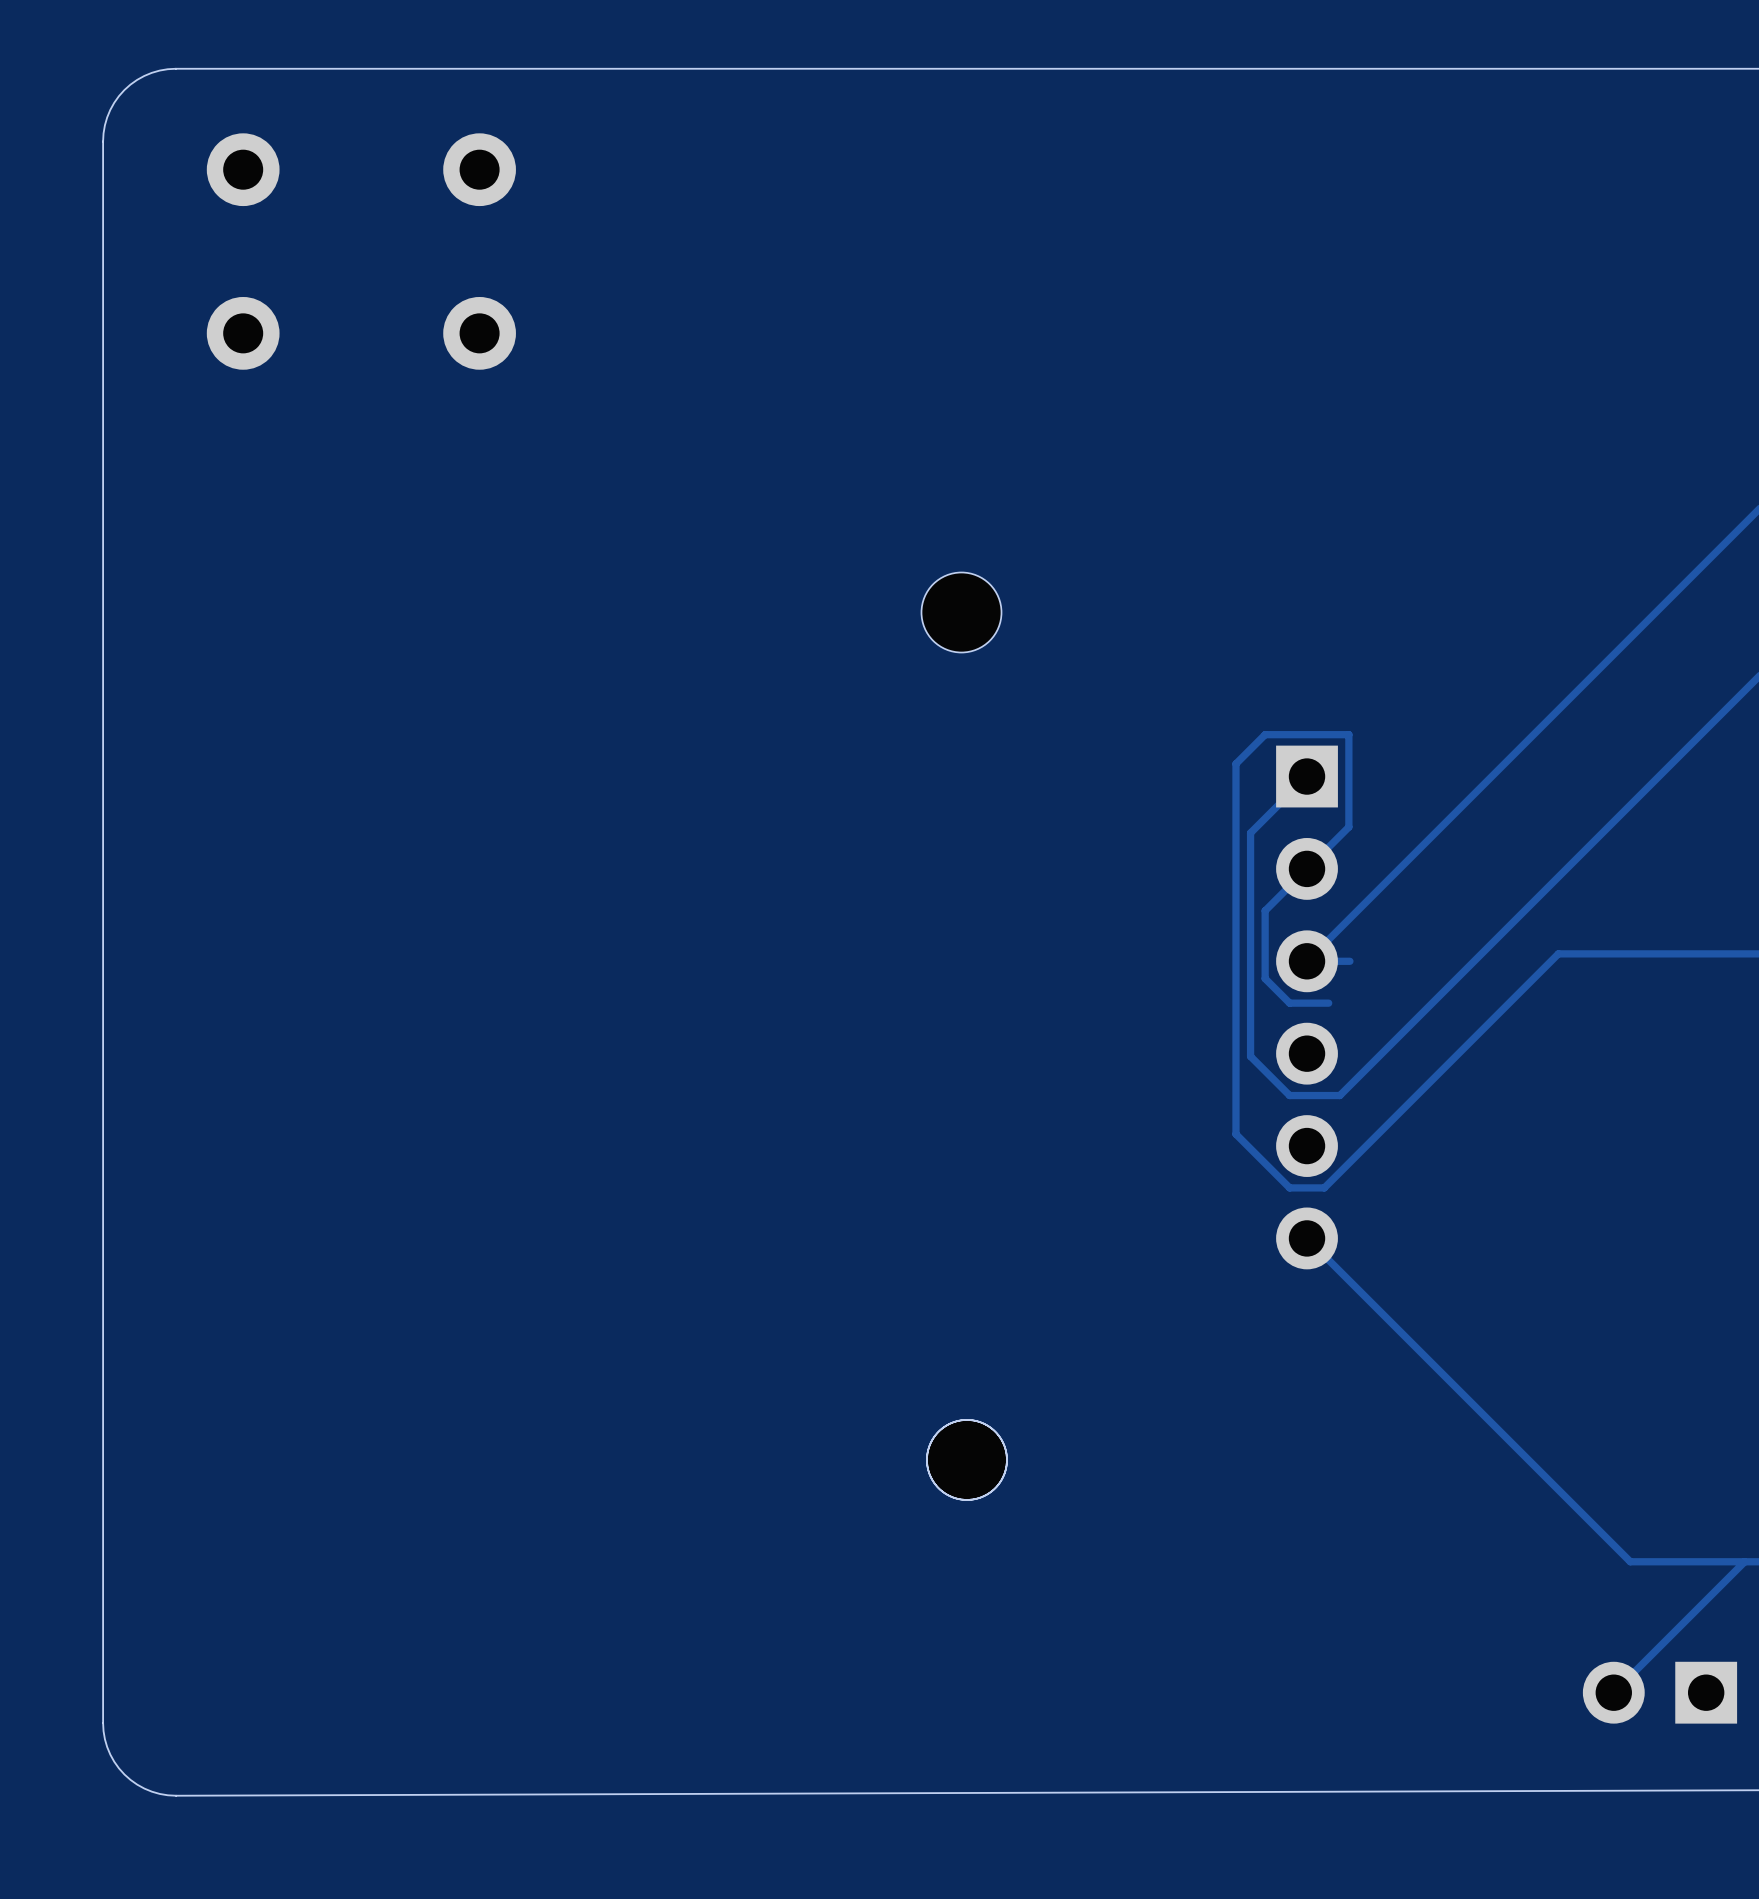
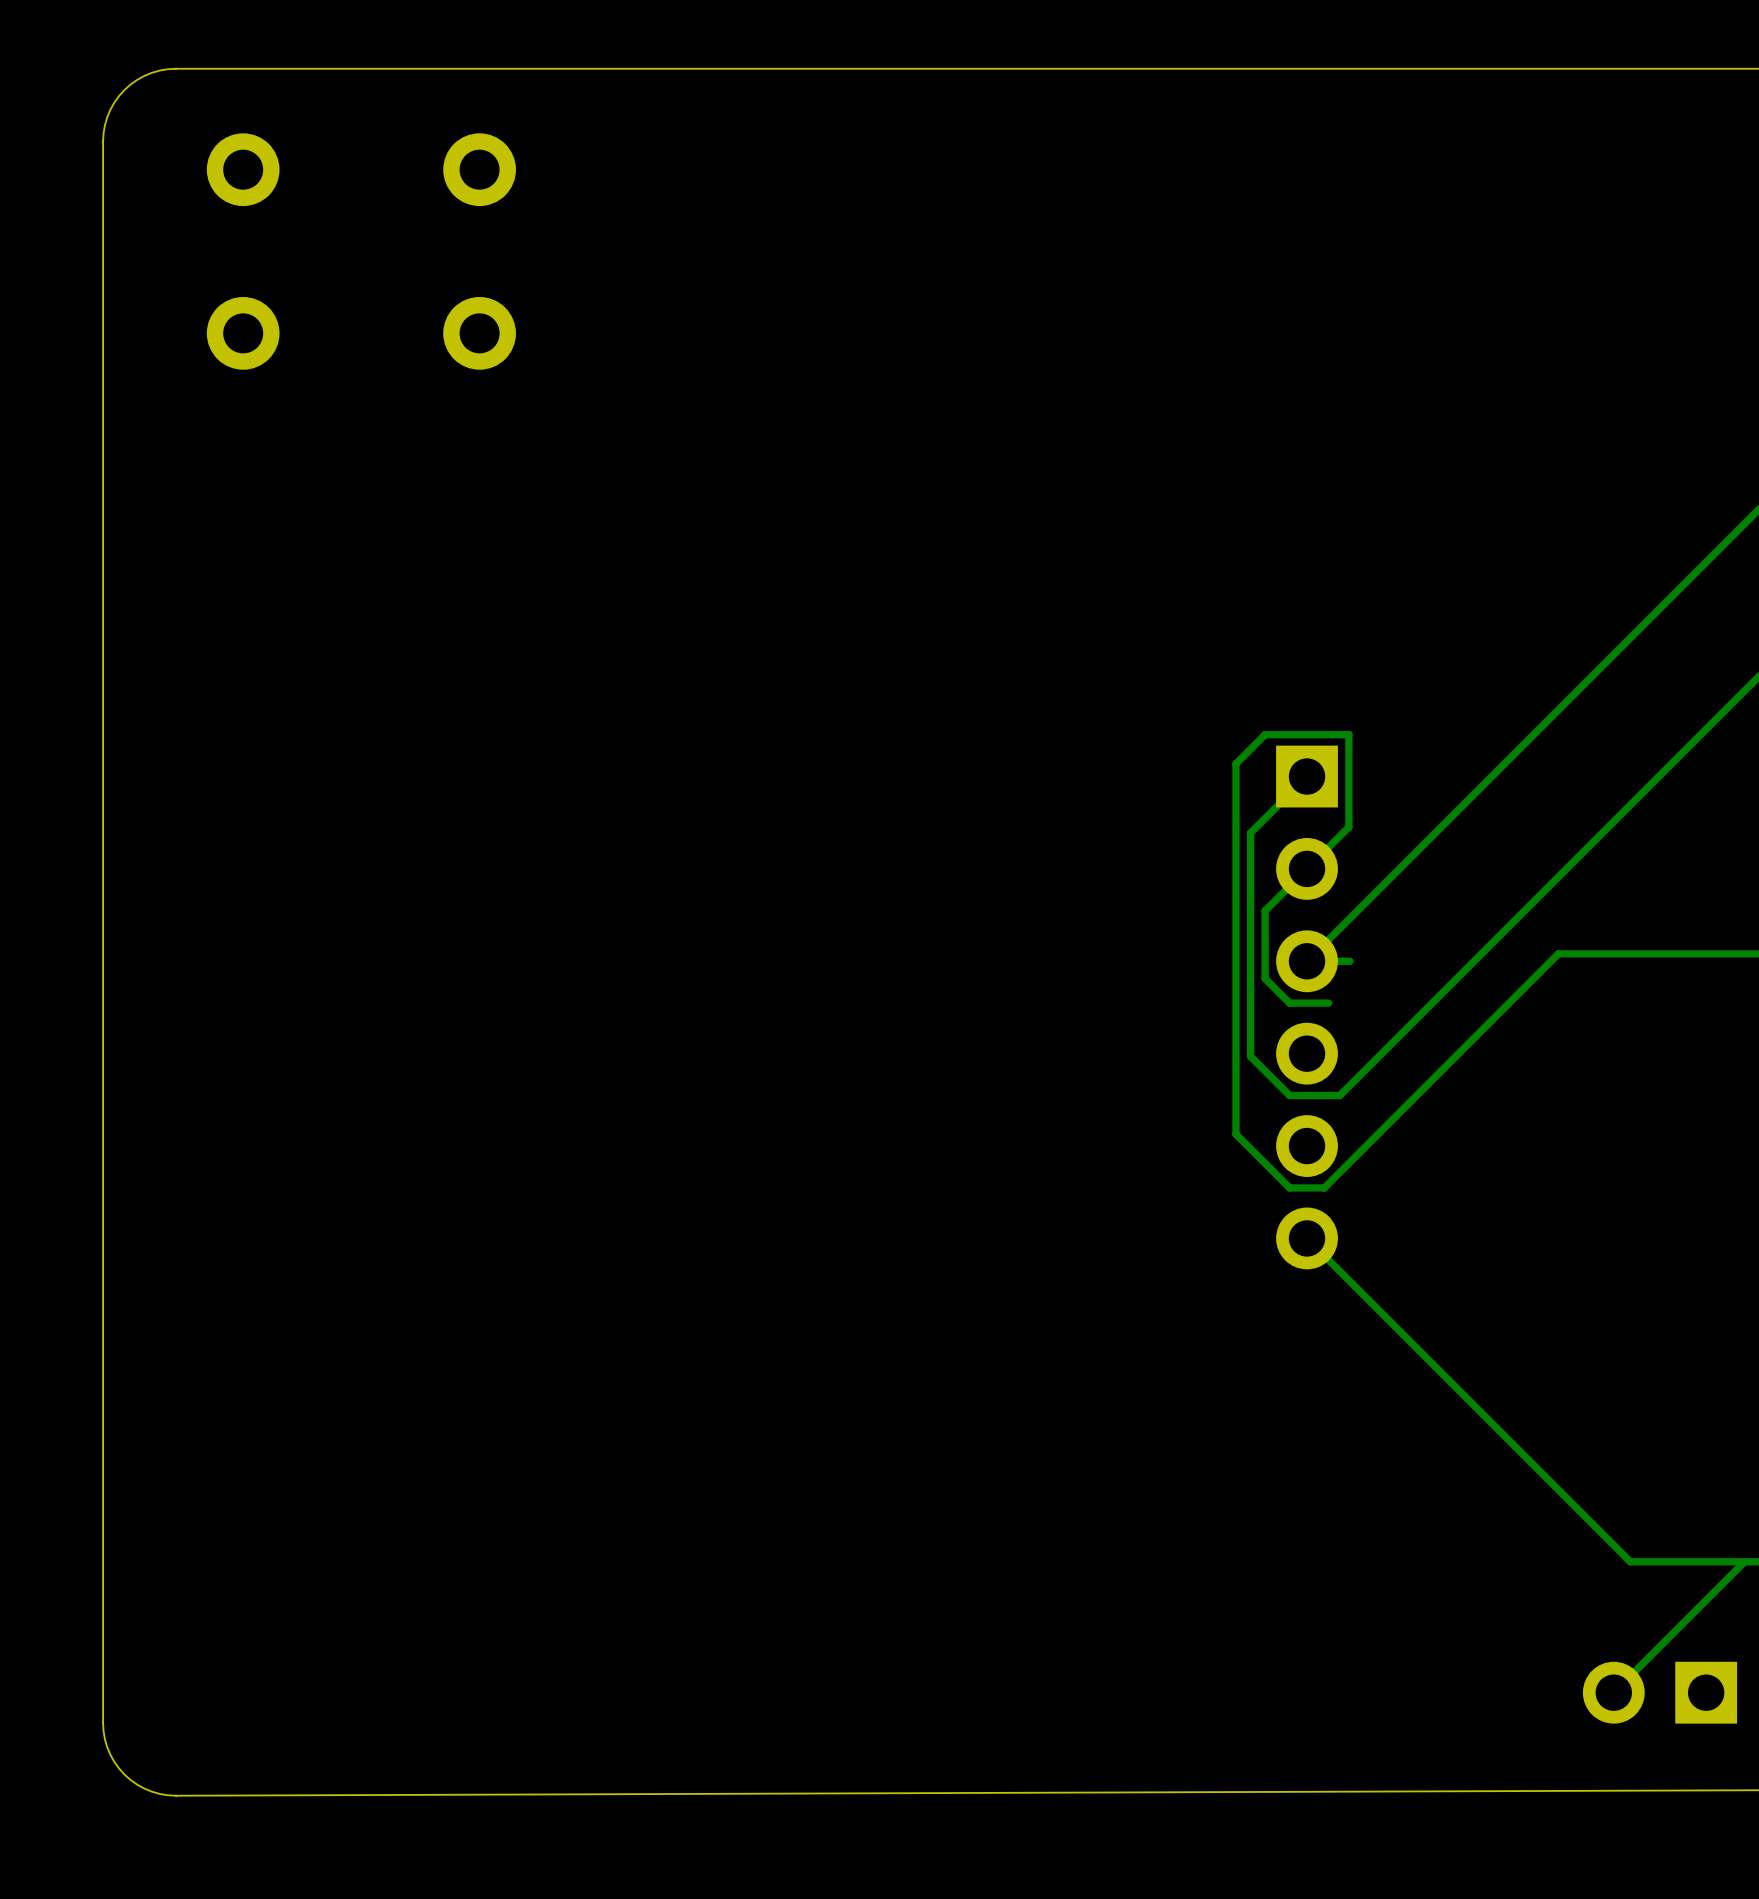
part: (961, 612) -> none
part: (966, 1459) -> none

